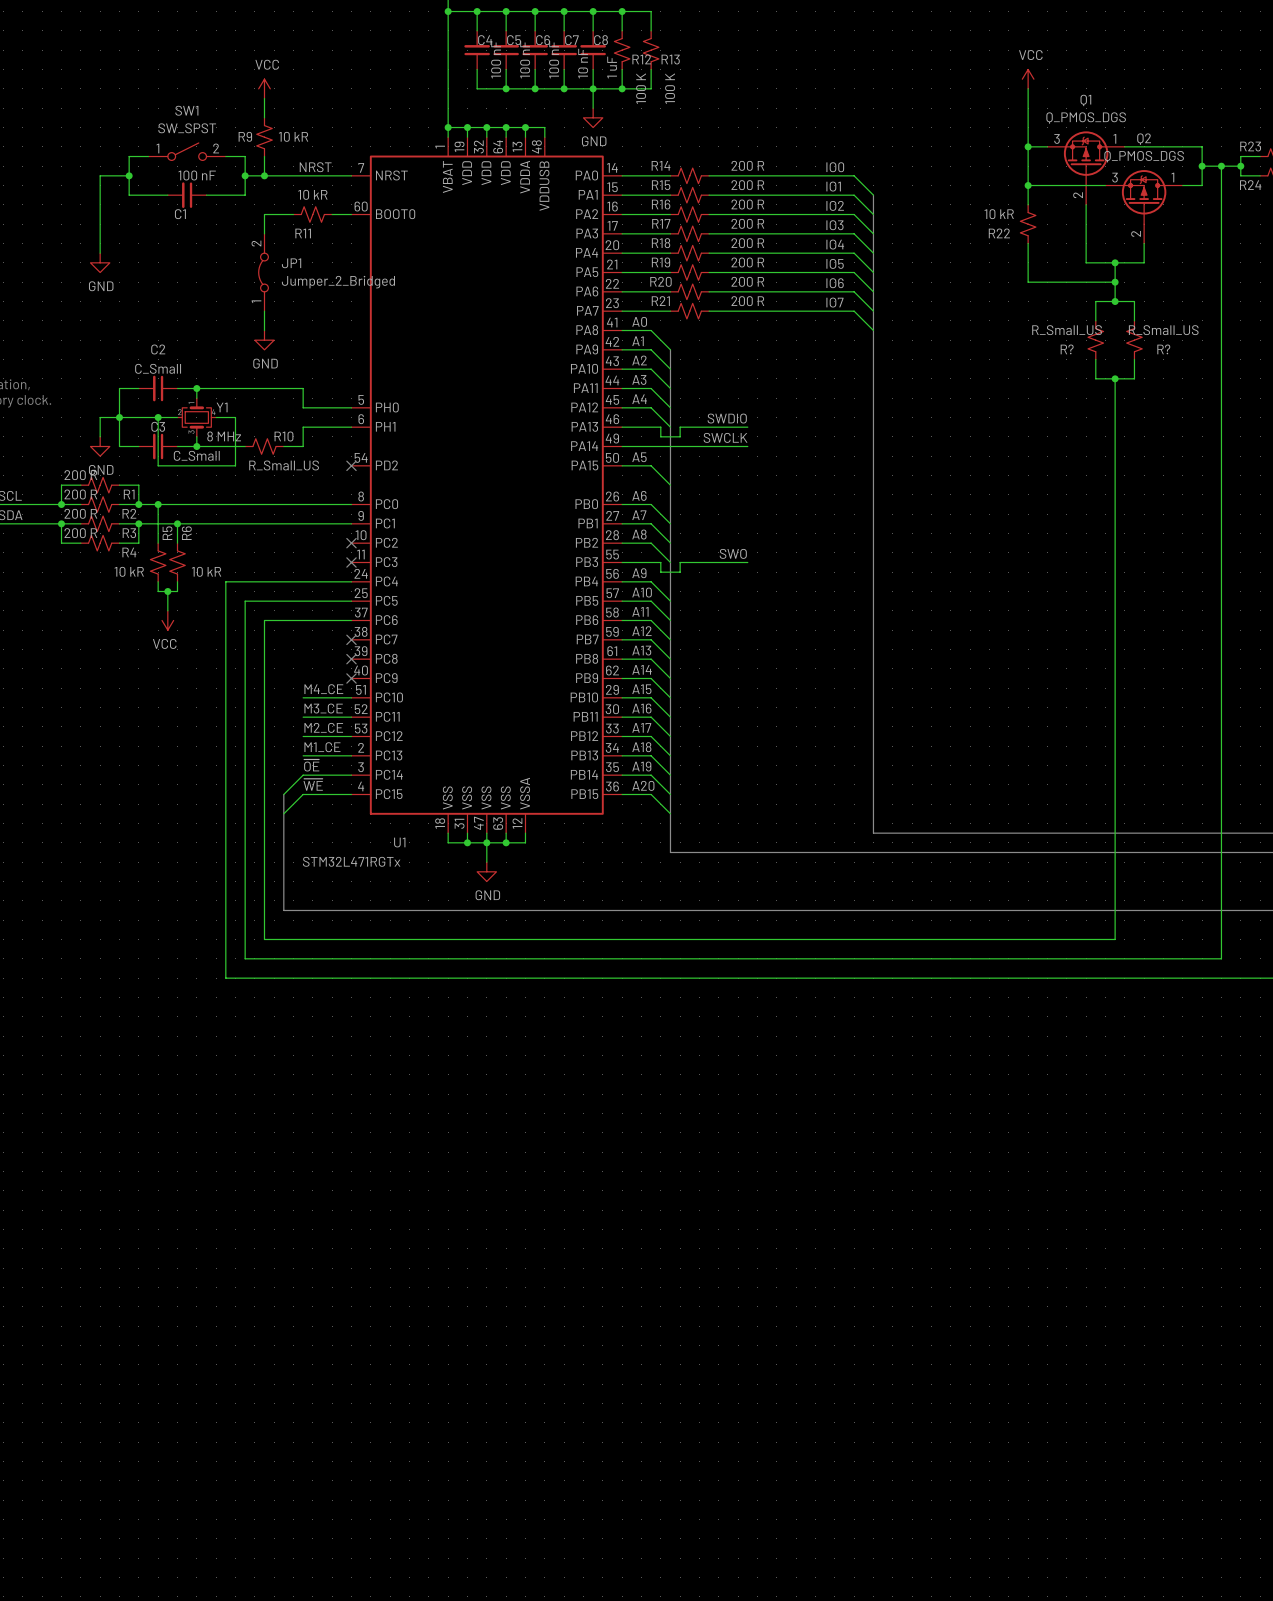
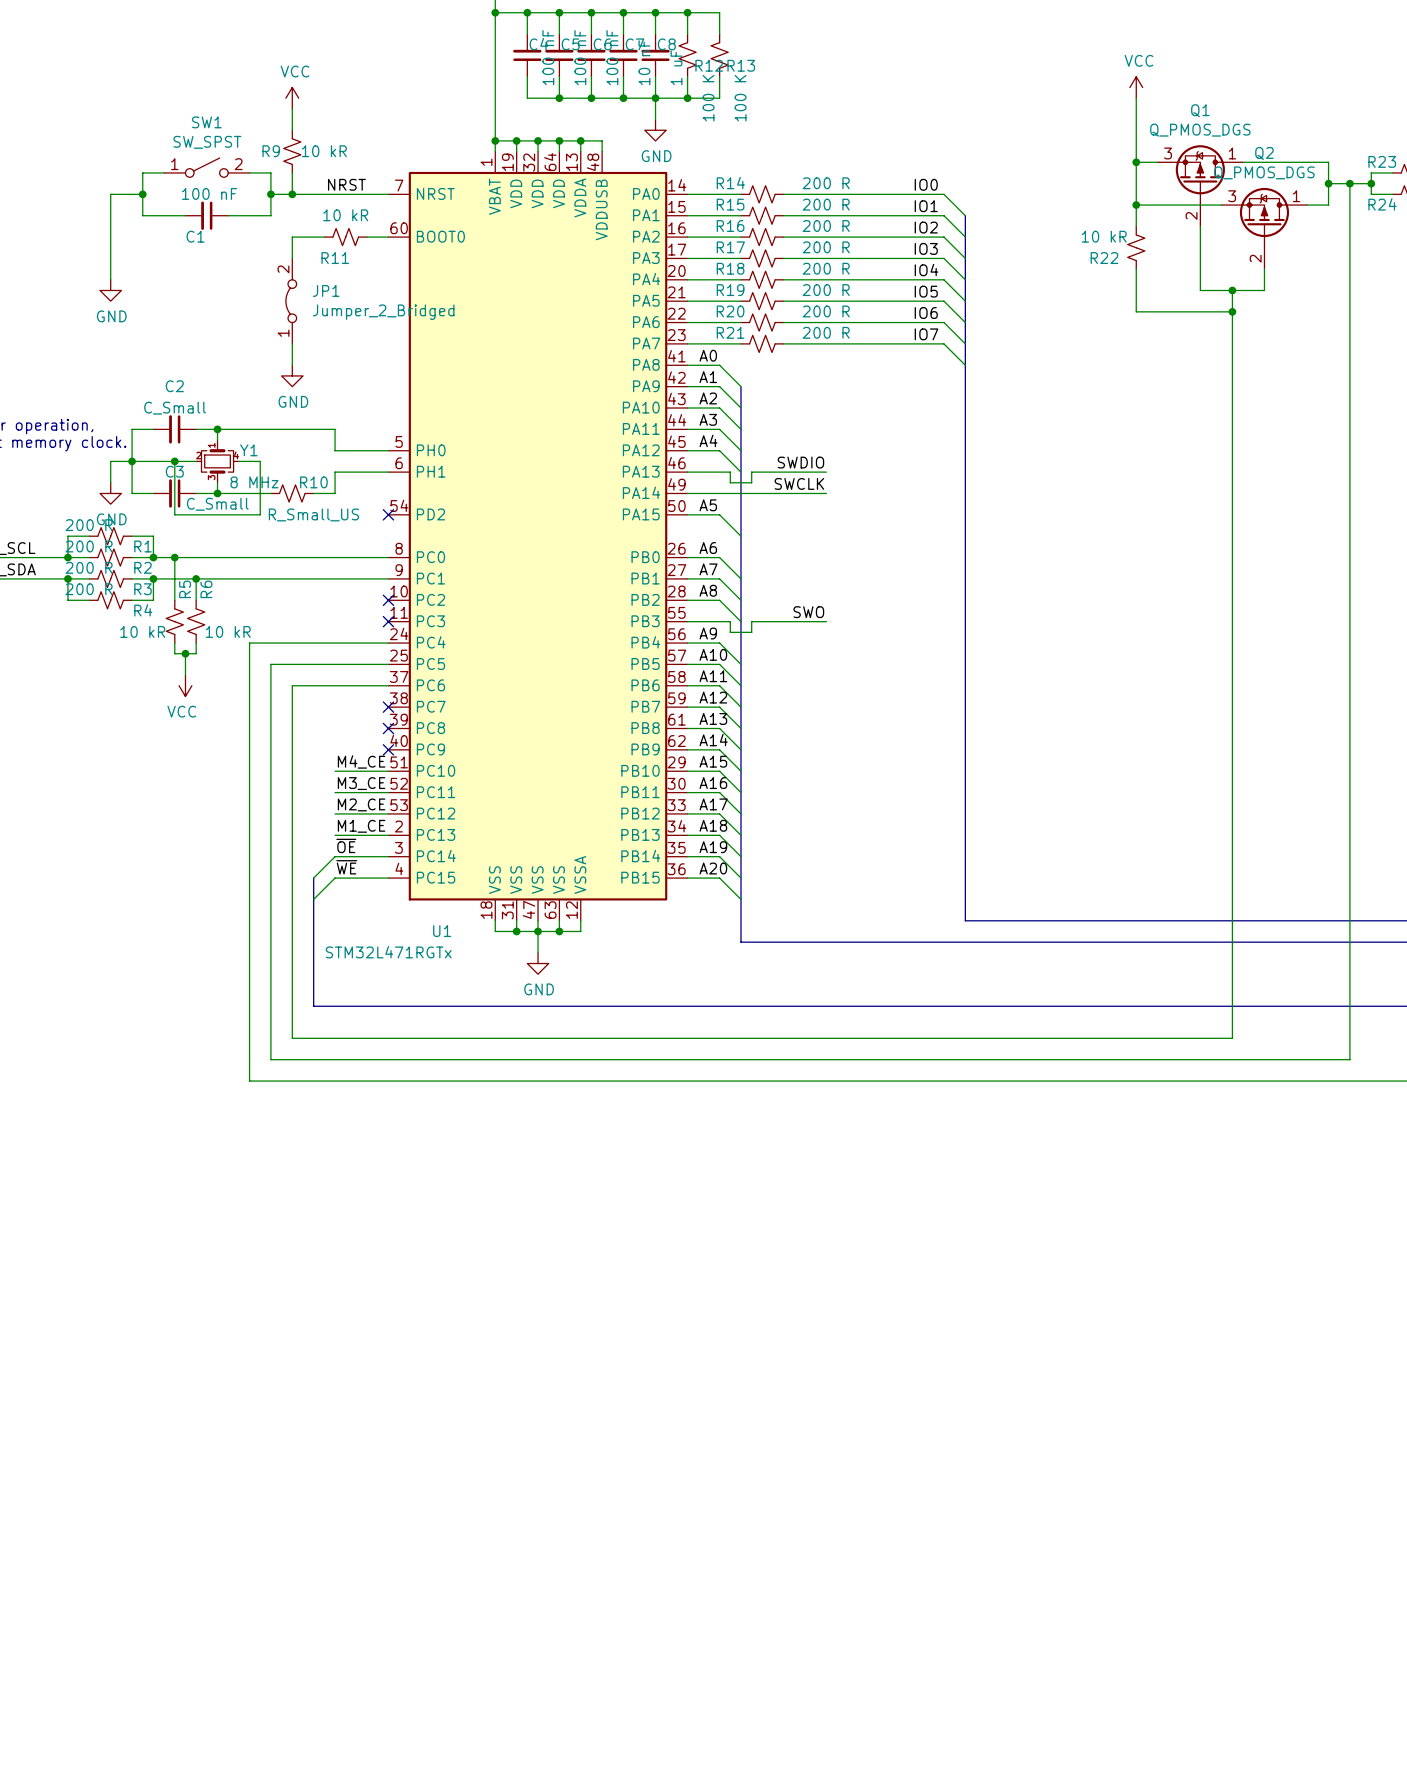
wire: none -> (1232, 333) (1232, 418)
junction: (1115, 301) -> none
wire: (1095, 320) (1095, 301) (1134, 301) (1134, 320) -> none
R?: R_Small_US (1095, 340) -> none
R?: R_Small_US (1134, 340) -> none
wire: (1095, 359) (1095, 378) (1134, 378) (1134, 359) -> none
junction: (1115, 378) -> none

